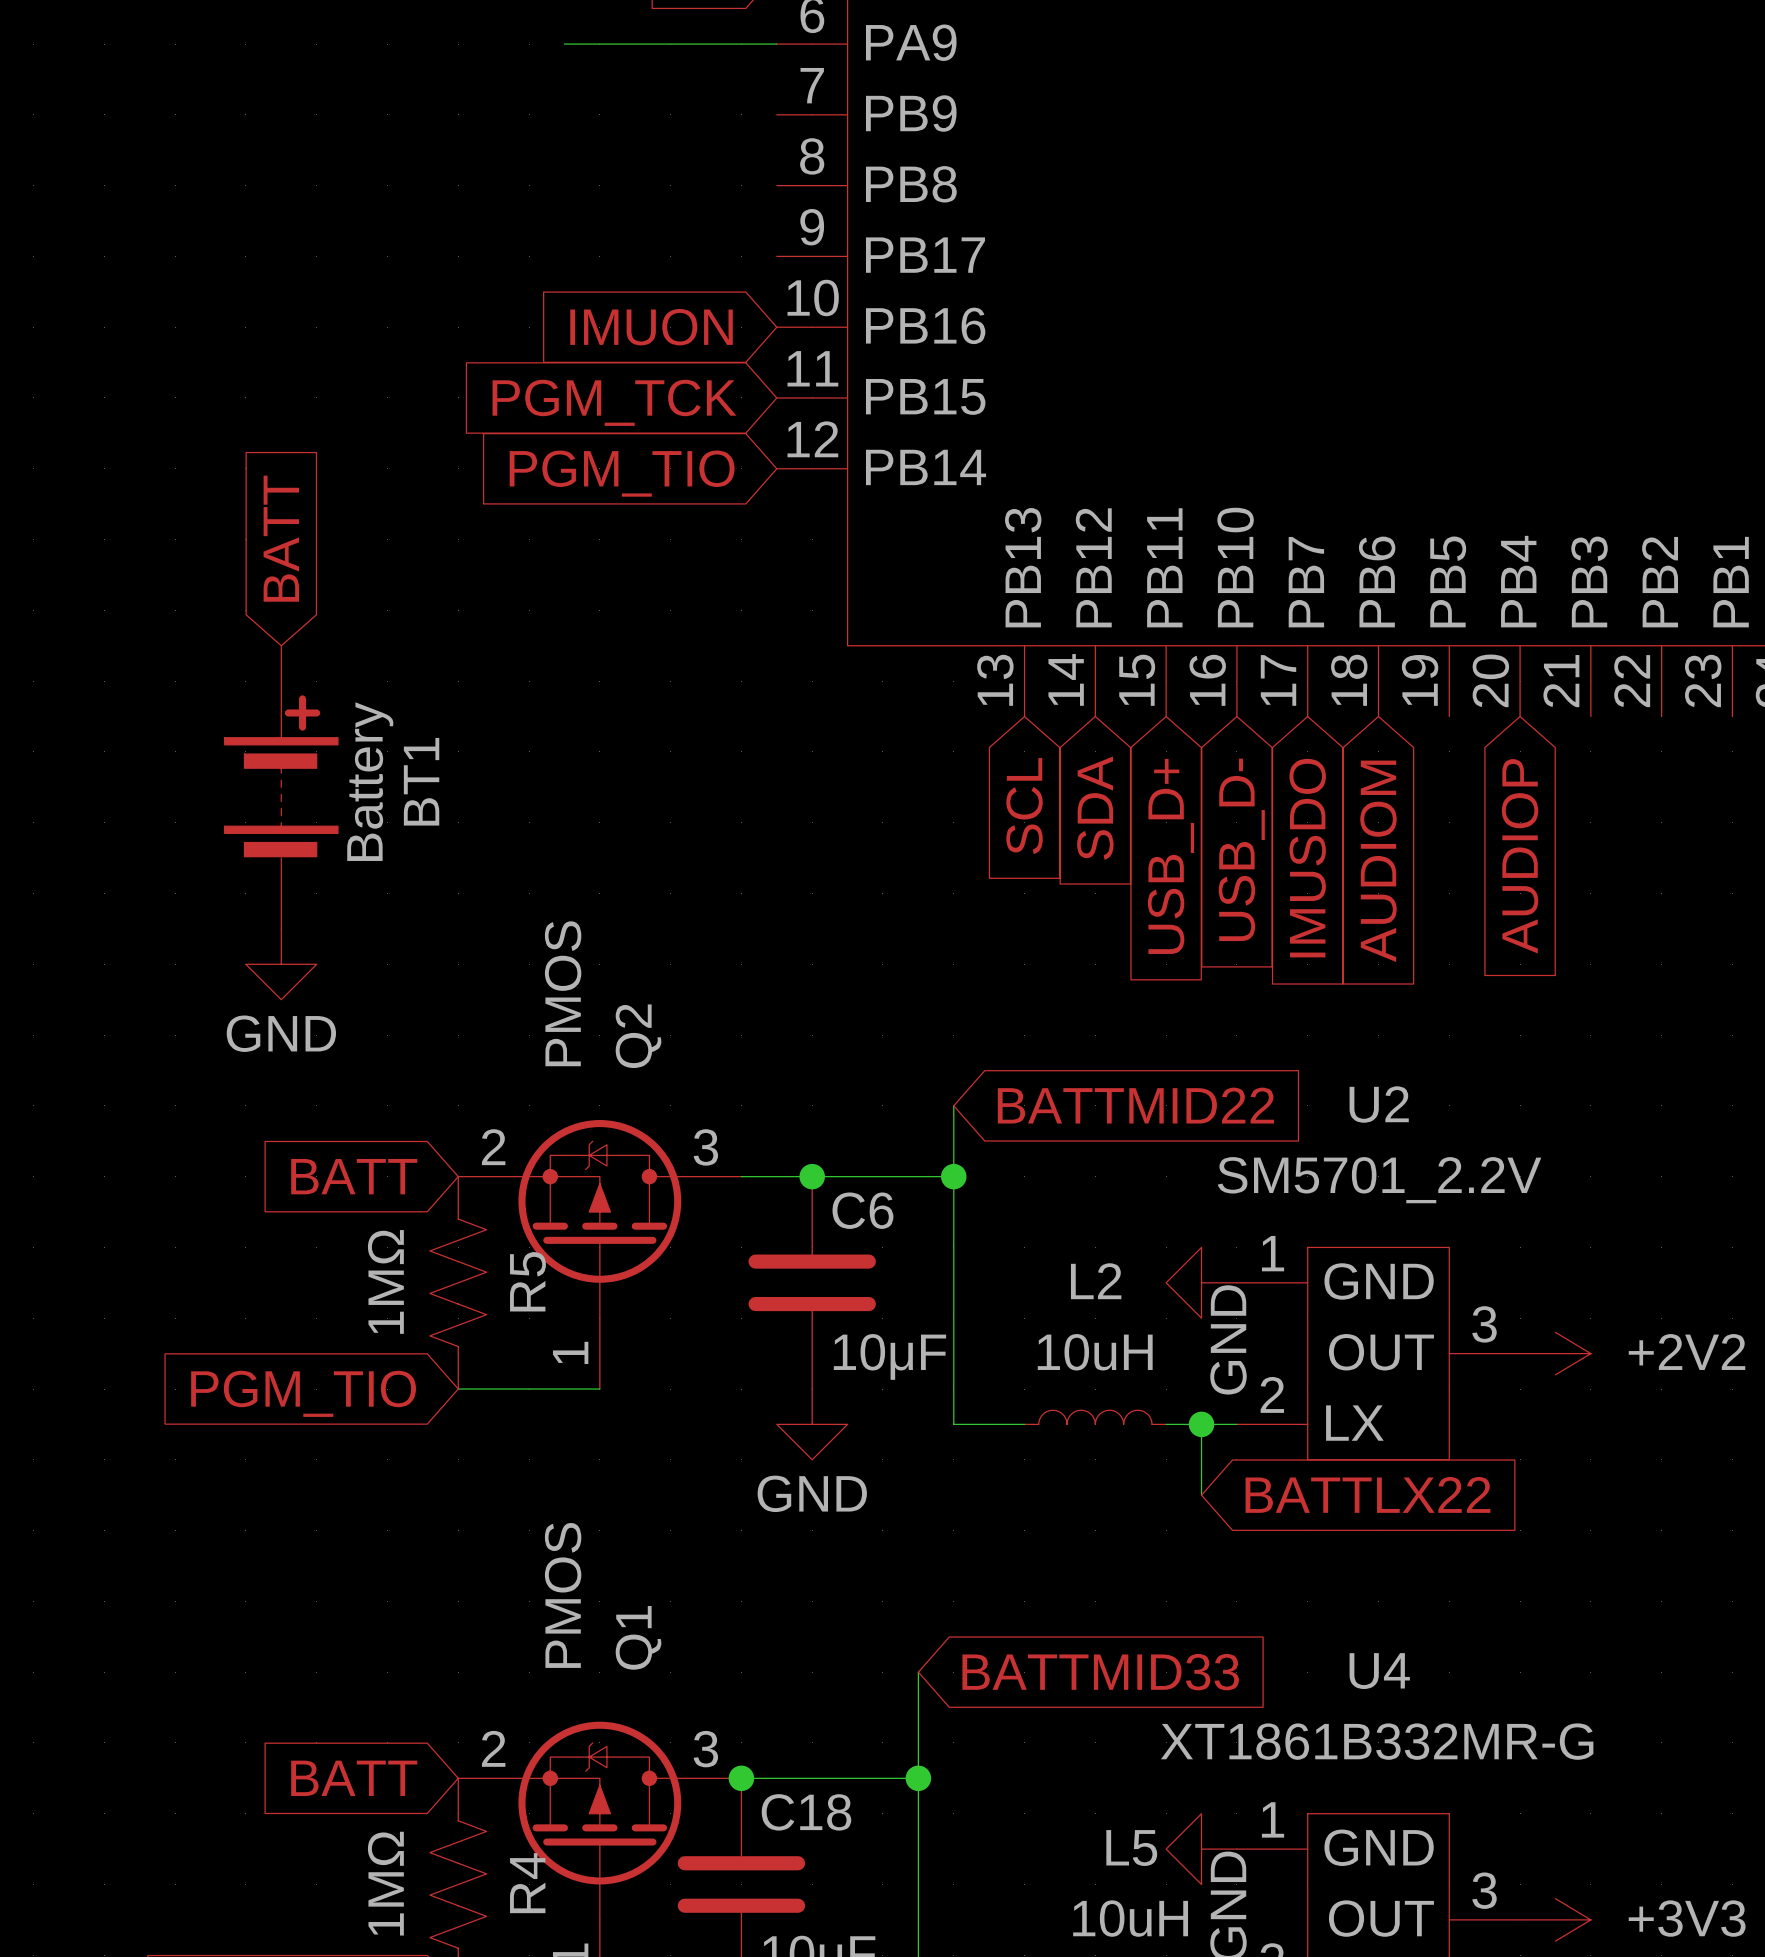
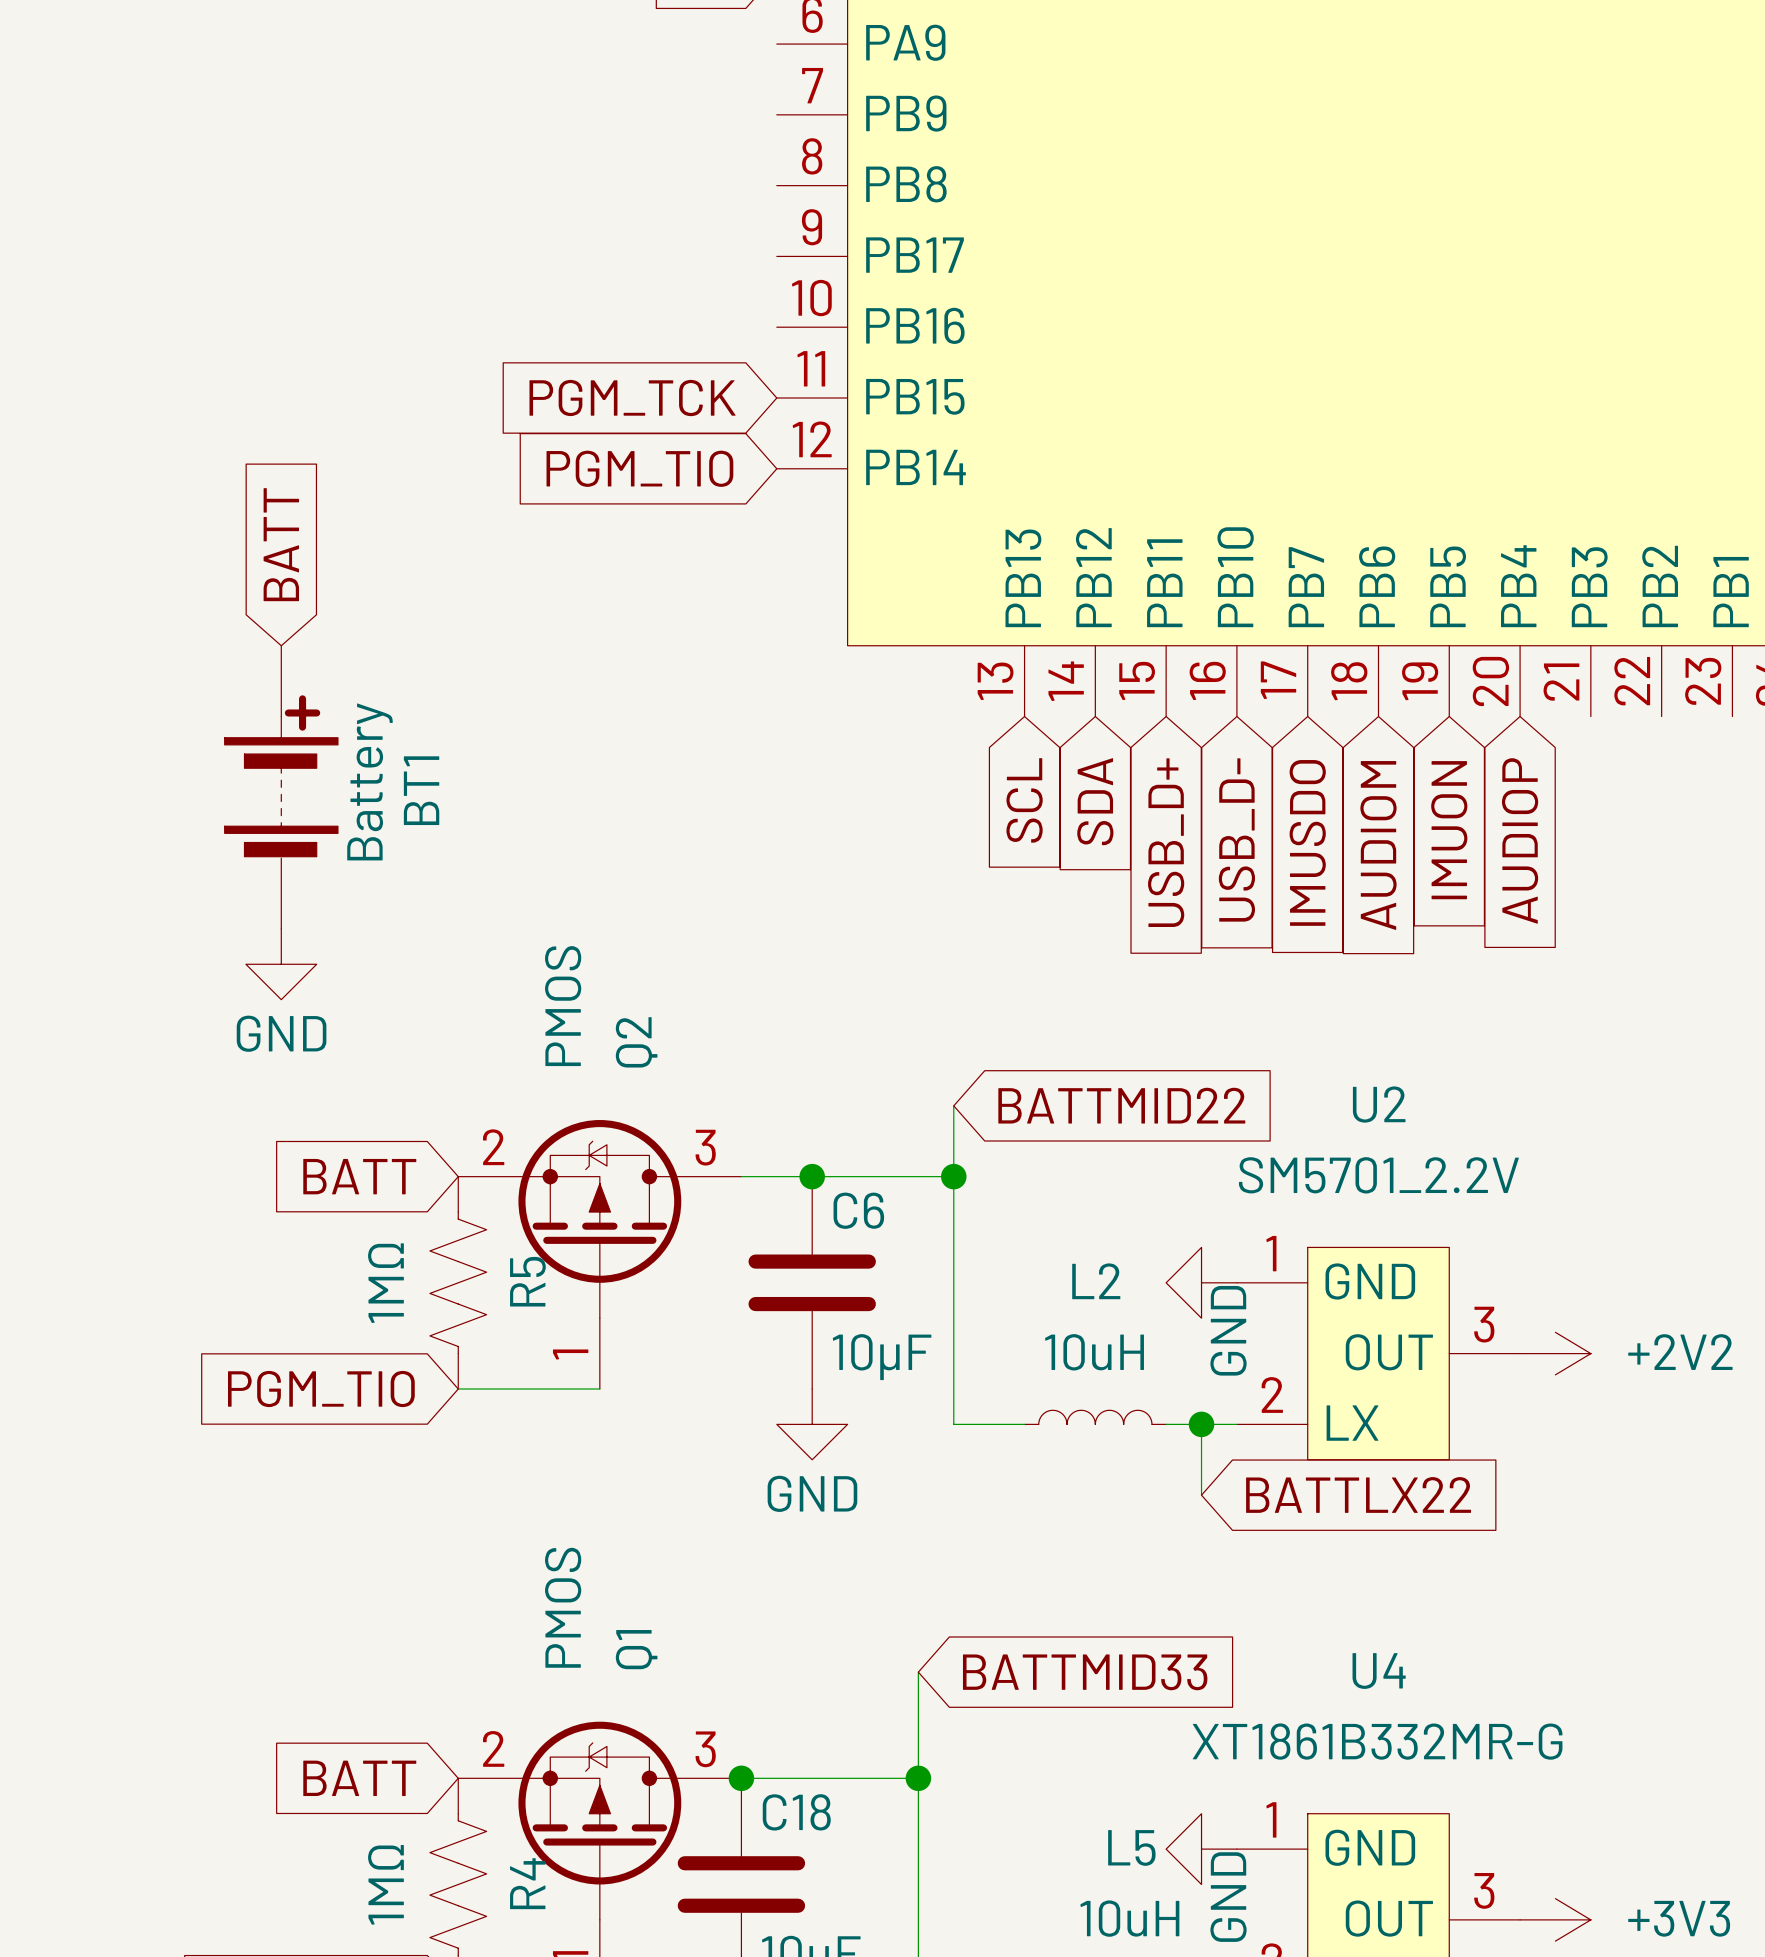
wire: (564, 44) (776, 44) -> none
global label: IMUON (651, 327) -> none
global label: none -> IMUON (1449, 830)

